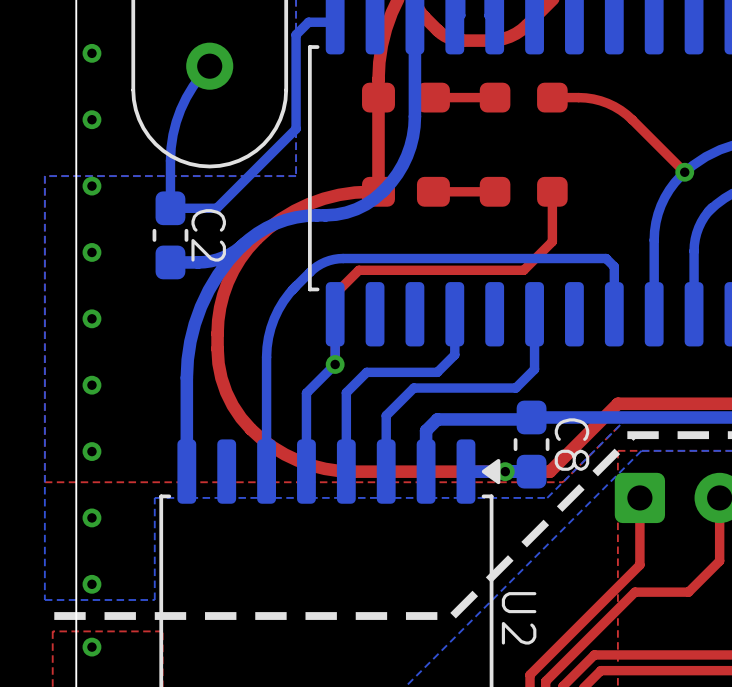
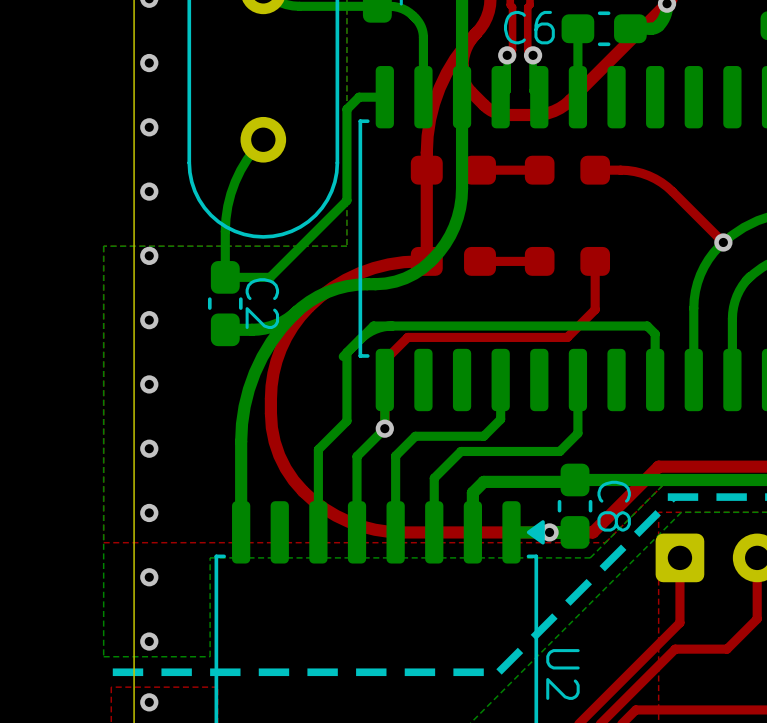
bottom track: (296, 285) (278, 309) (270, 327) (267, 347) (266, 386) -> (392, 326) (373, 326) (346, 352) (346, 421) (318, 449)

